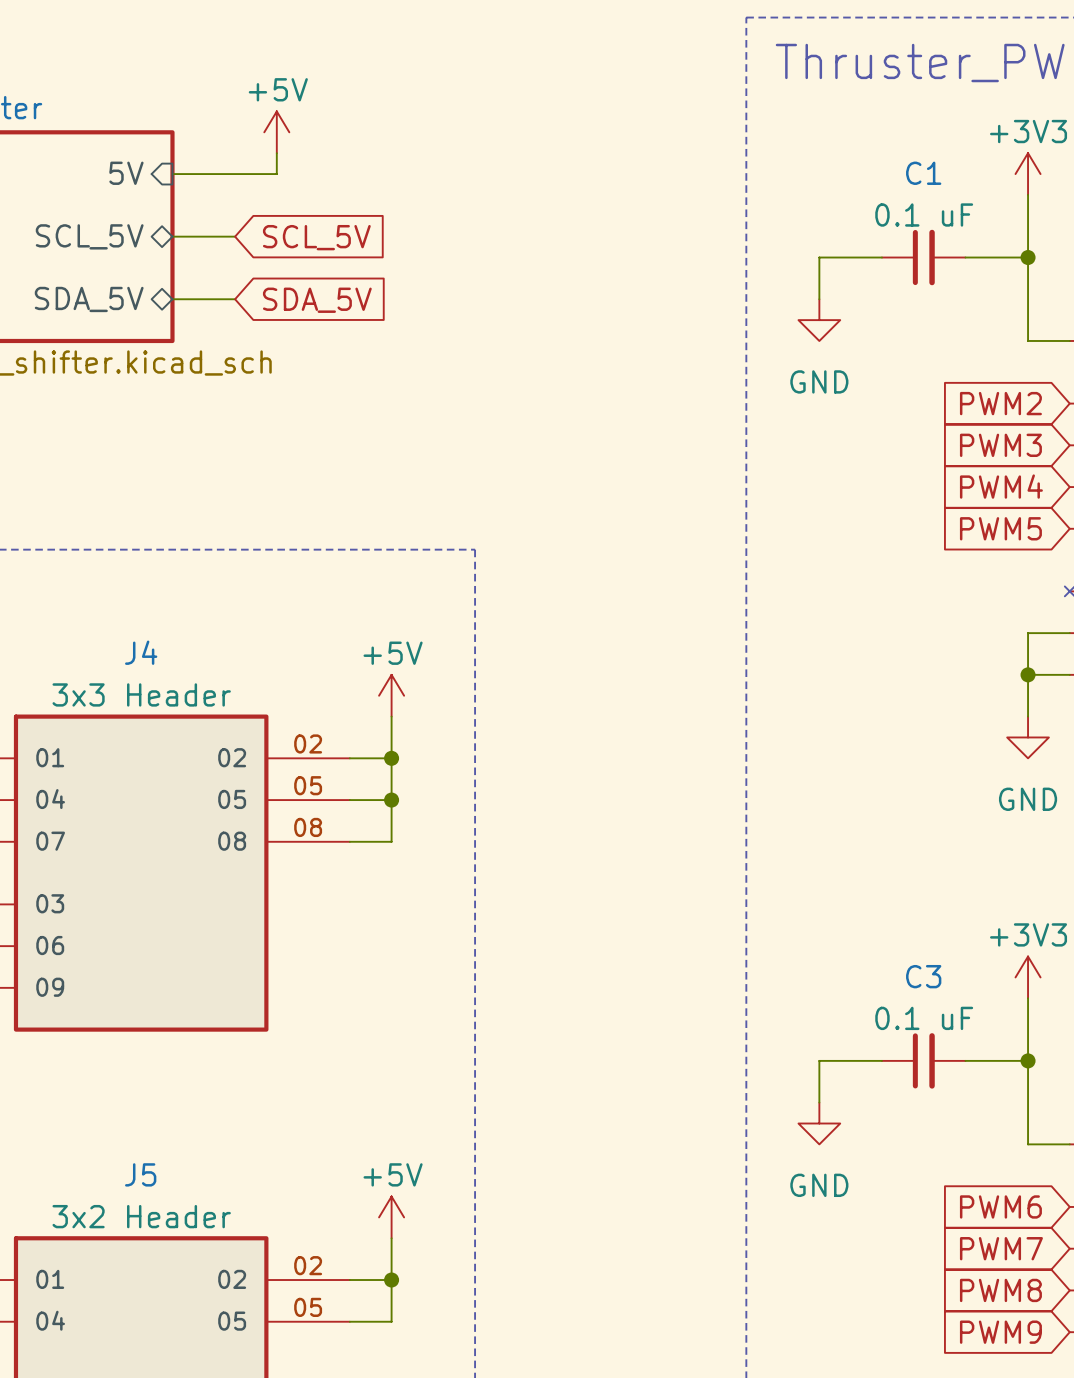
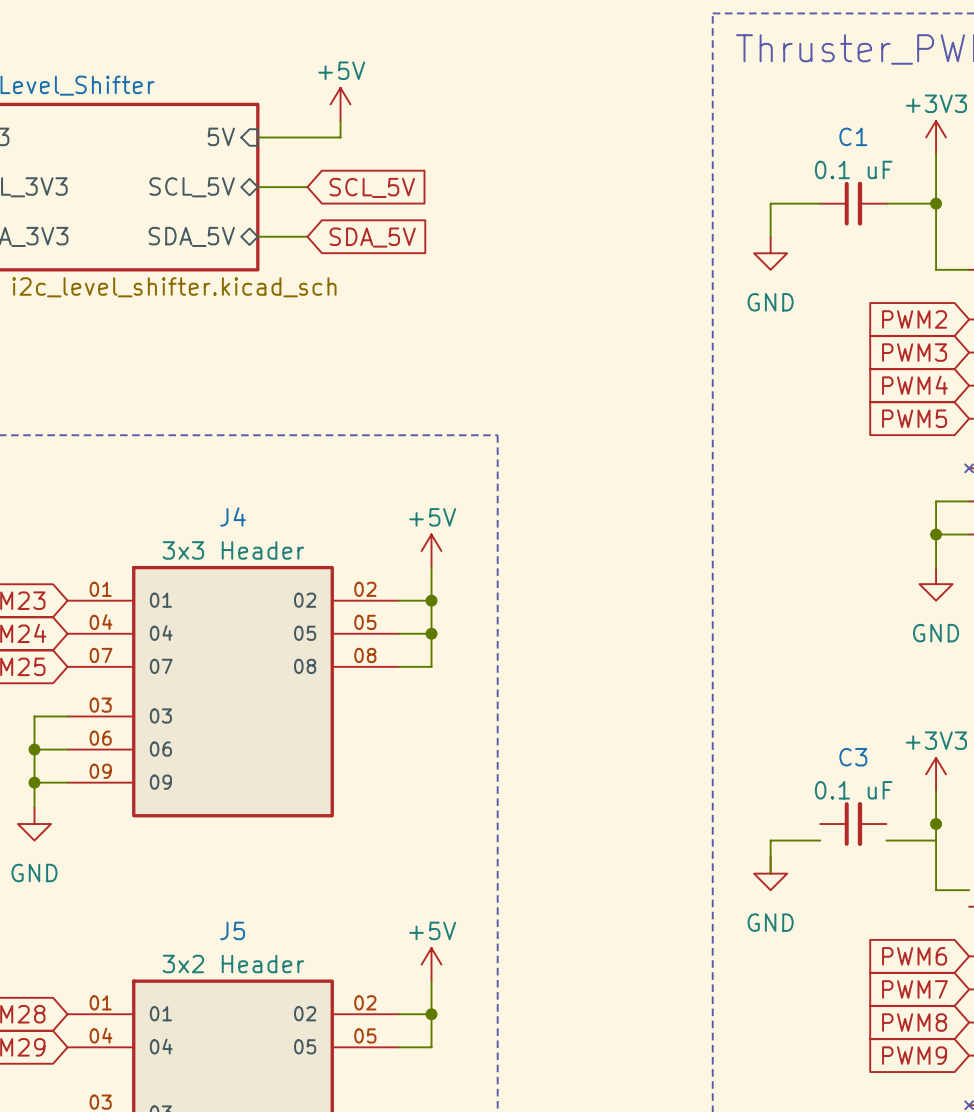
C3 position: (923, 1060) -> (853, 824)
junction position: (1028, 1060) -> (936, 824)
power symbol position: GND (819, 1123) -> GND (770, 873)
wire: (1028, 1123) (1028, 1144) (1069, 1144) -> (936, 890) (969, 890)

